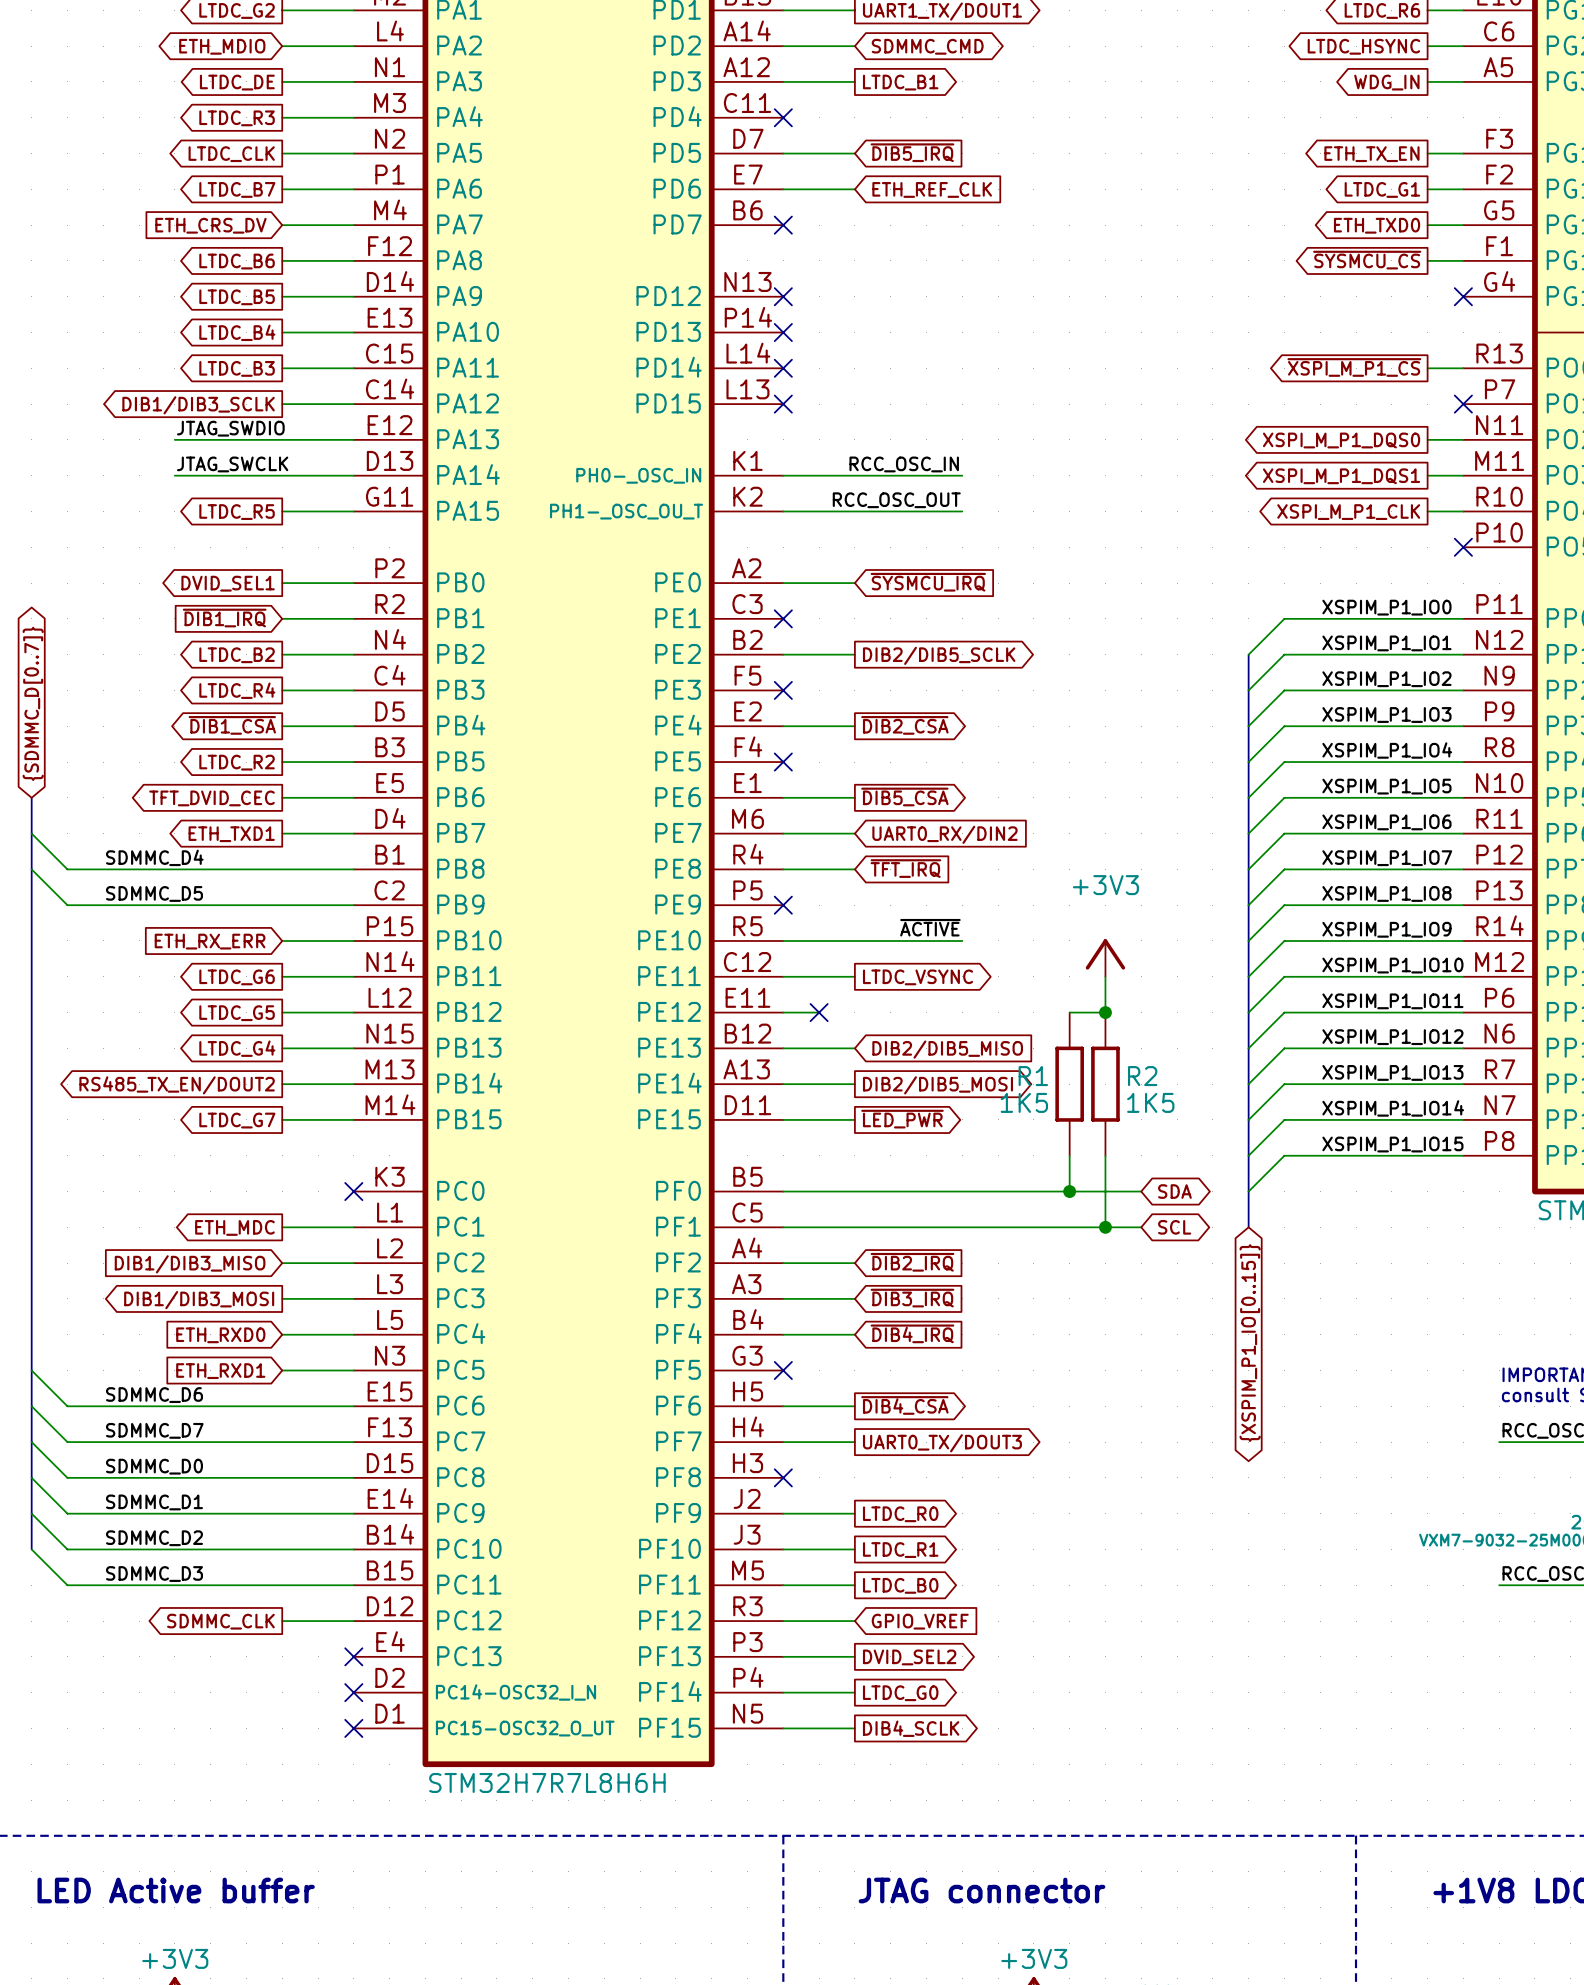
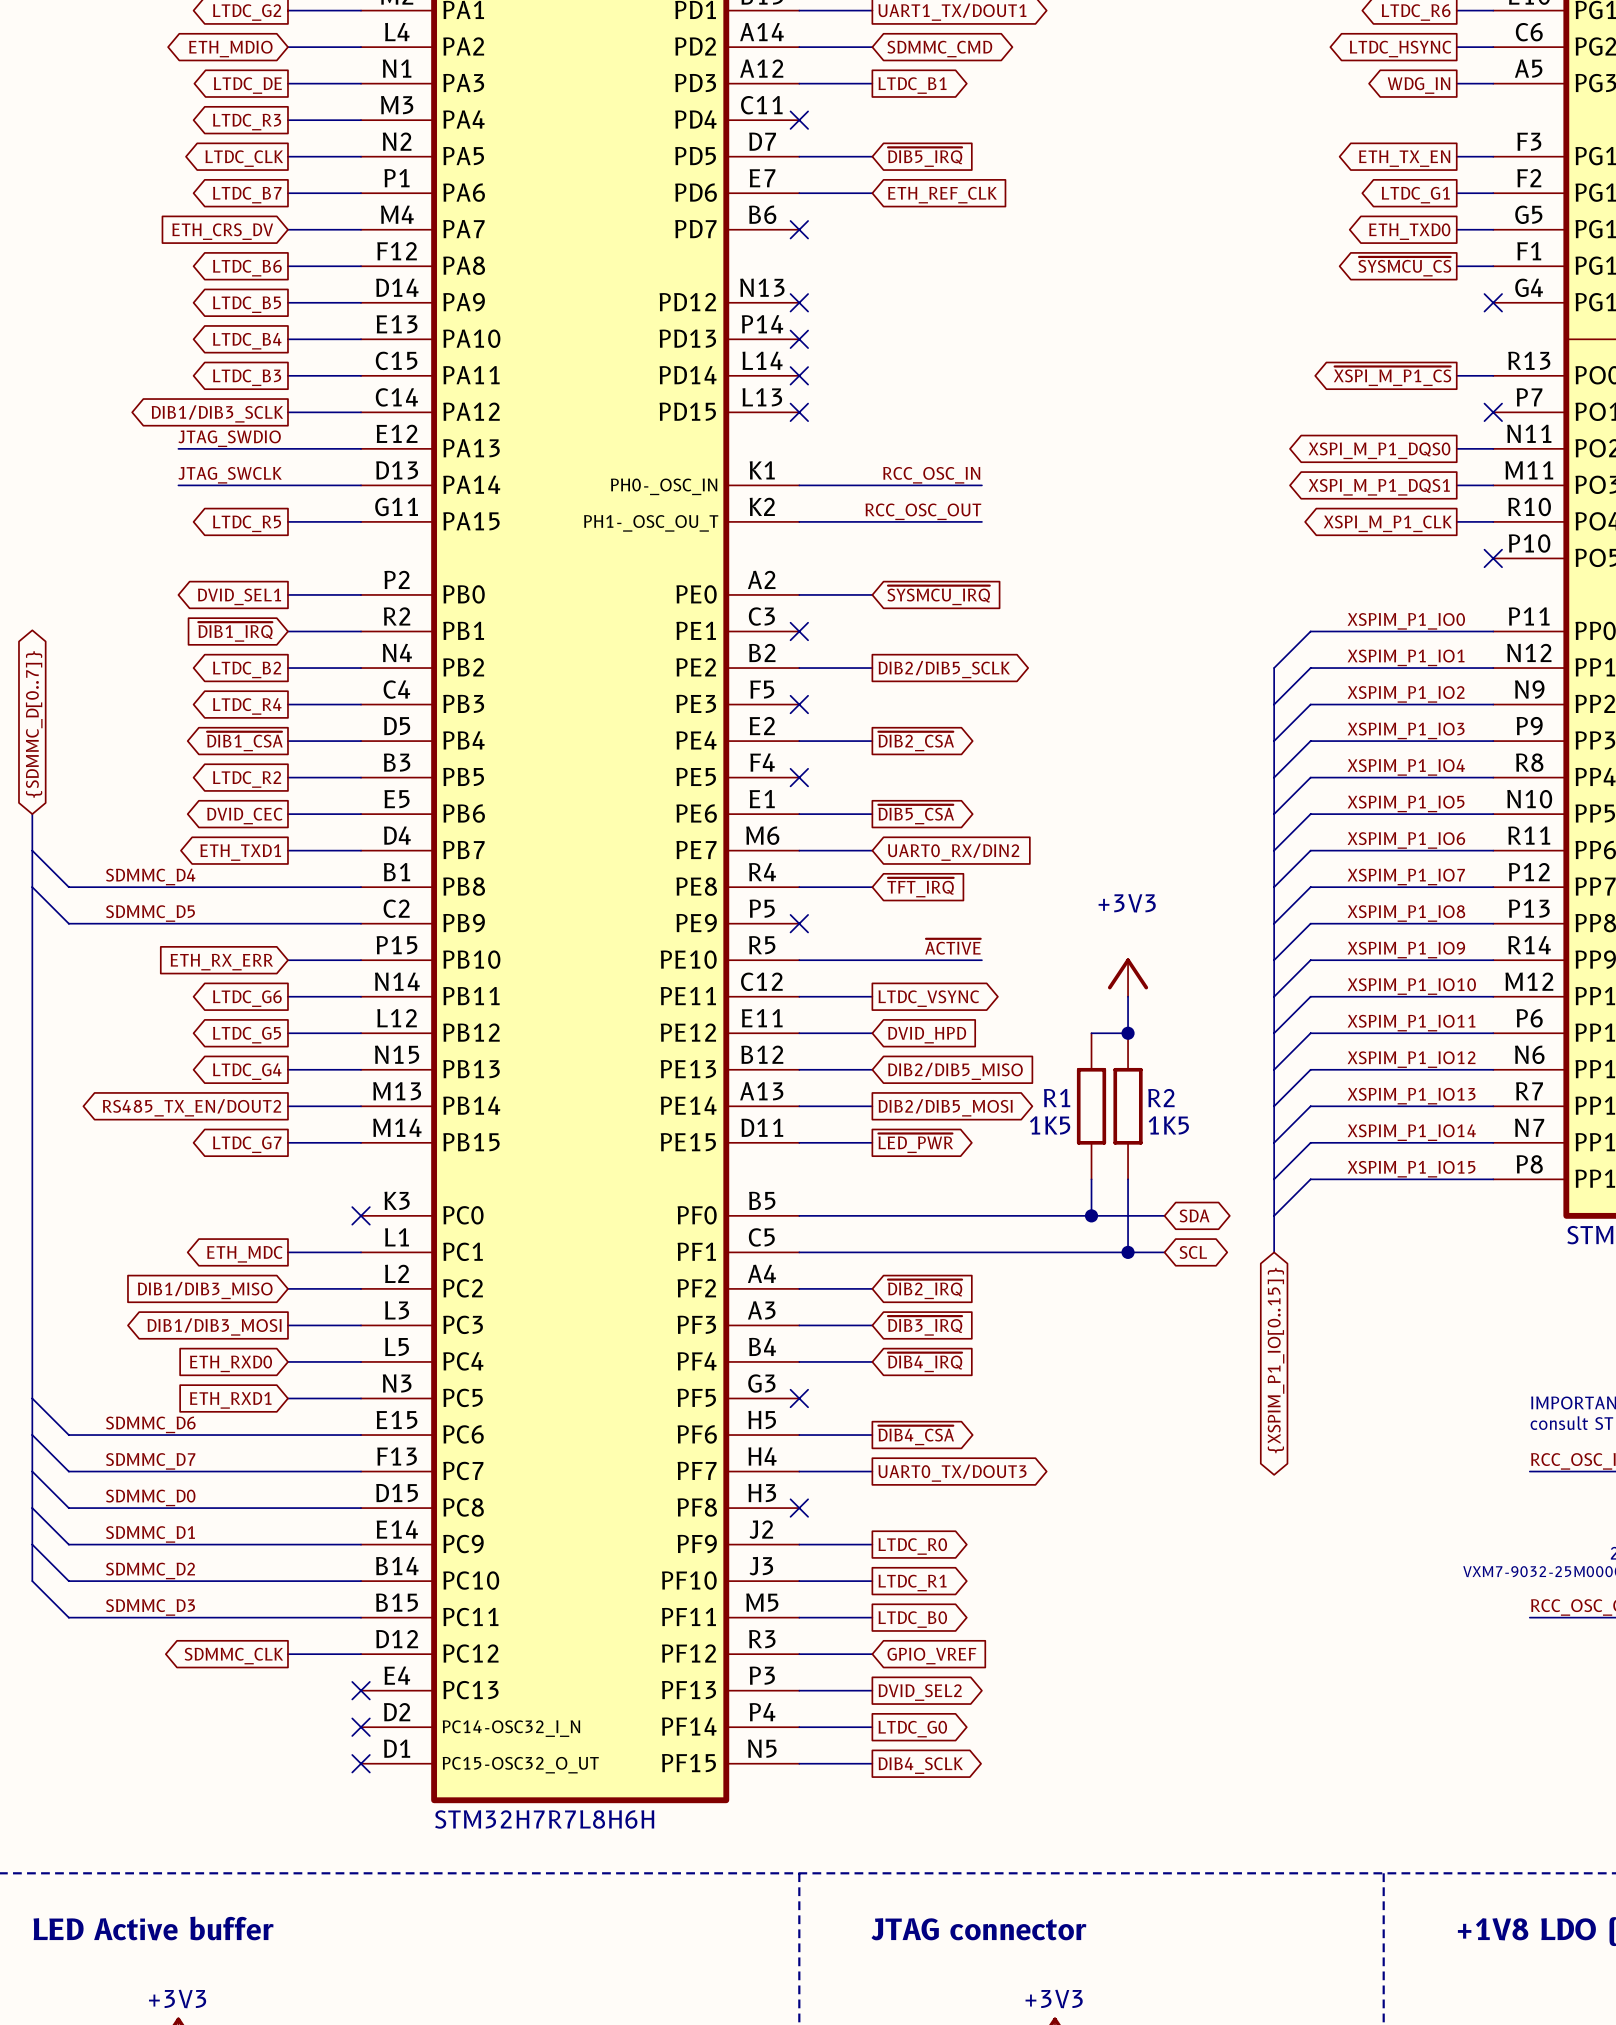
global label: TFT_DVID_CEC (211, 798) -> DVID_CEC (244, 816)
wire: none -> (835, 1033) (872, 1033)
no-connect mark: (819, 1012) -> none
global label: none -> DVID_HPD (927, 1035)

